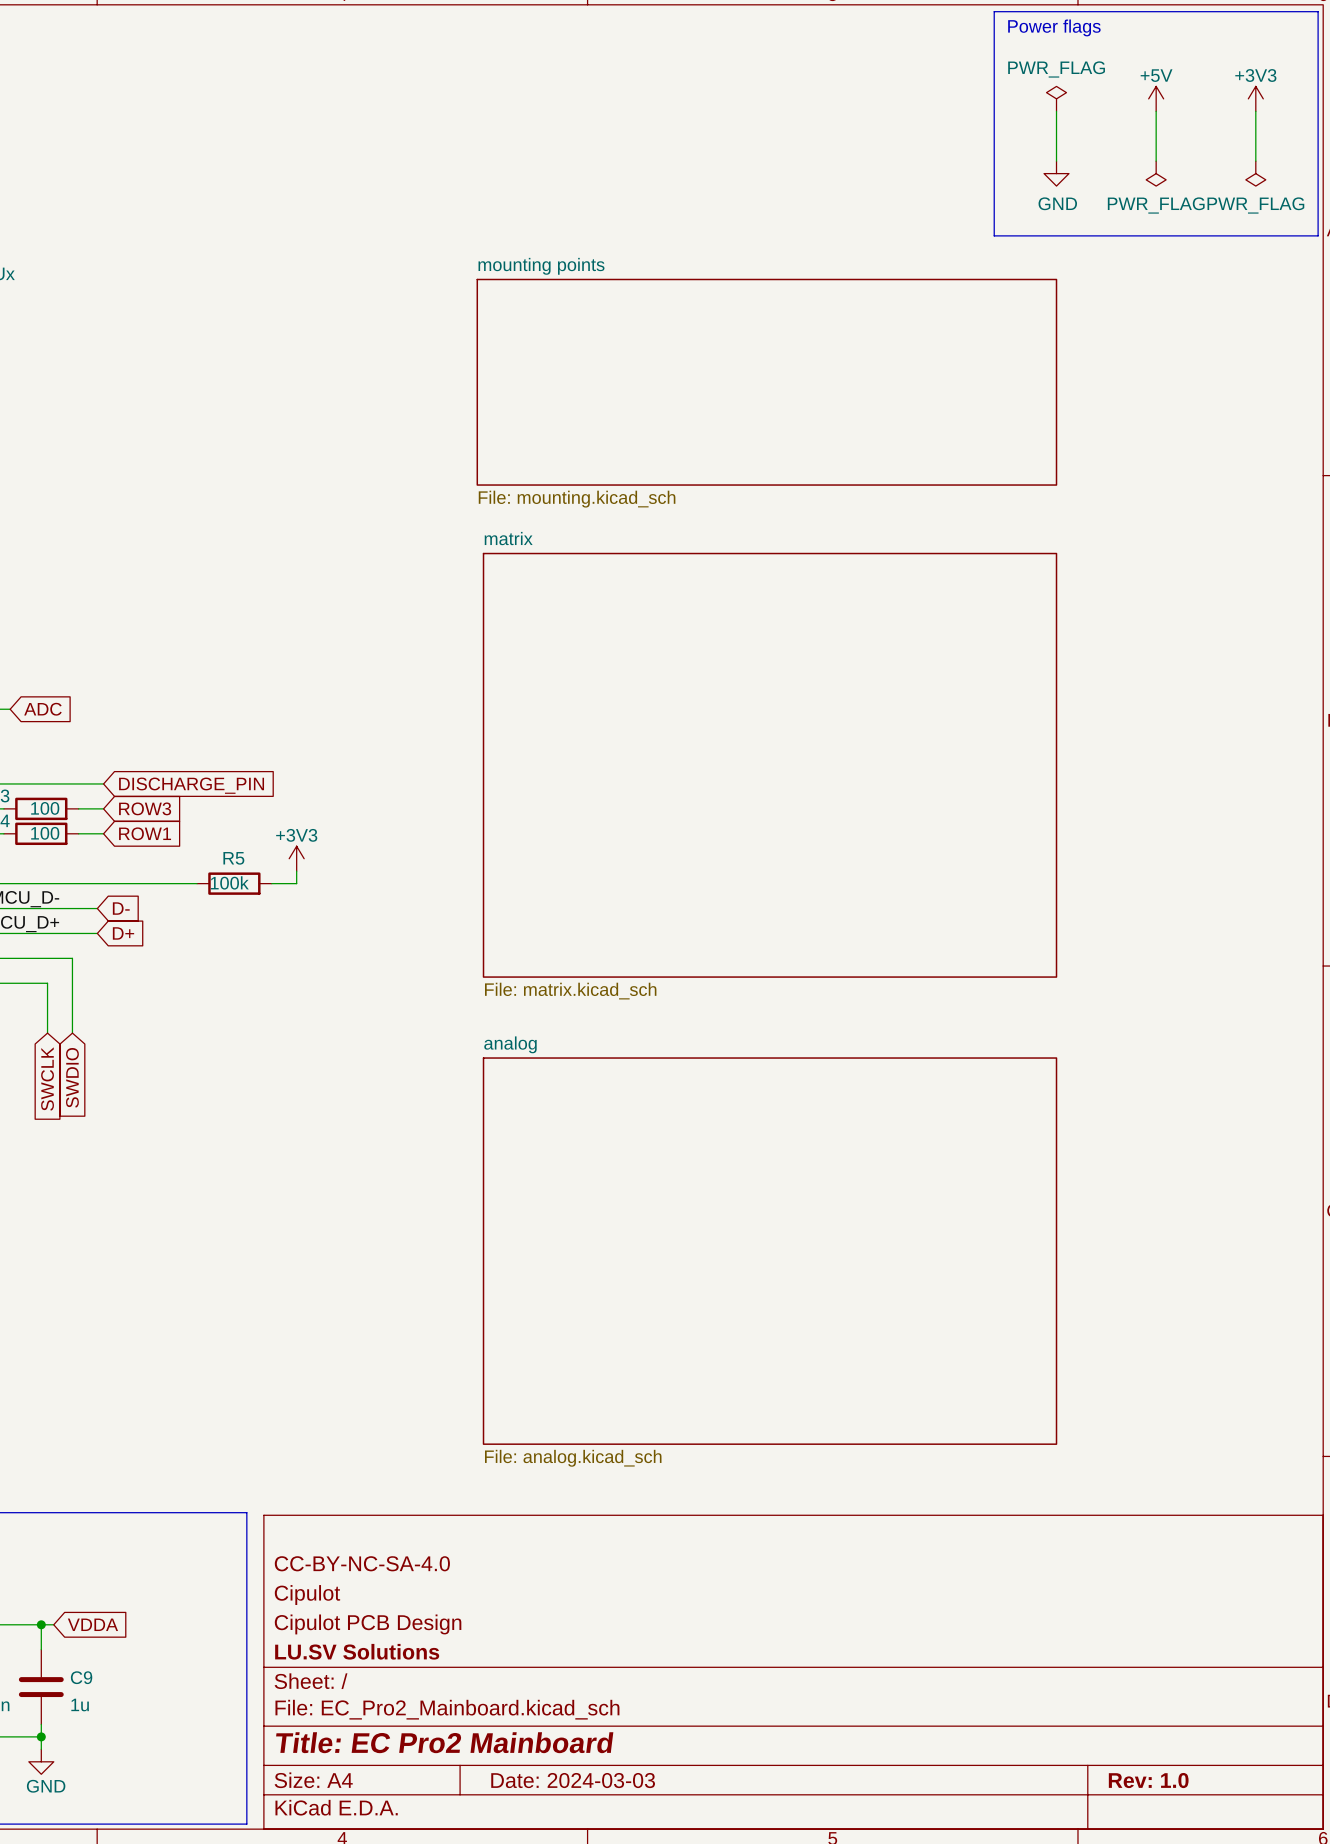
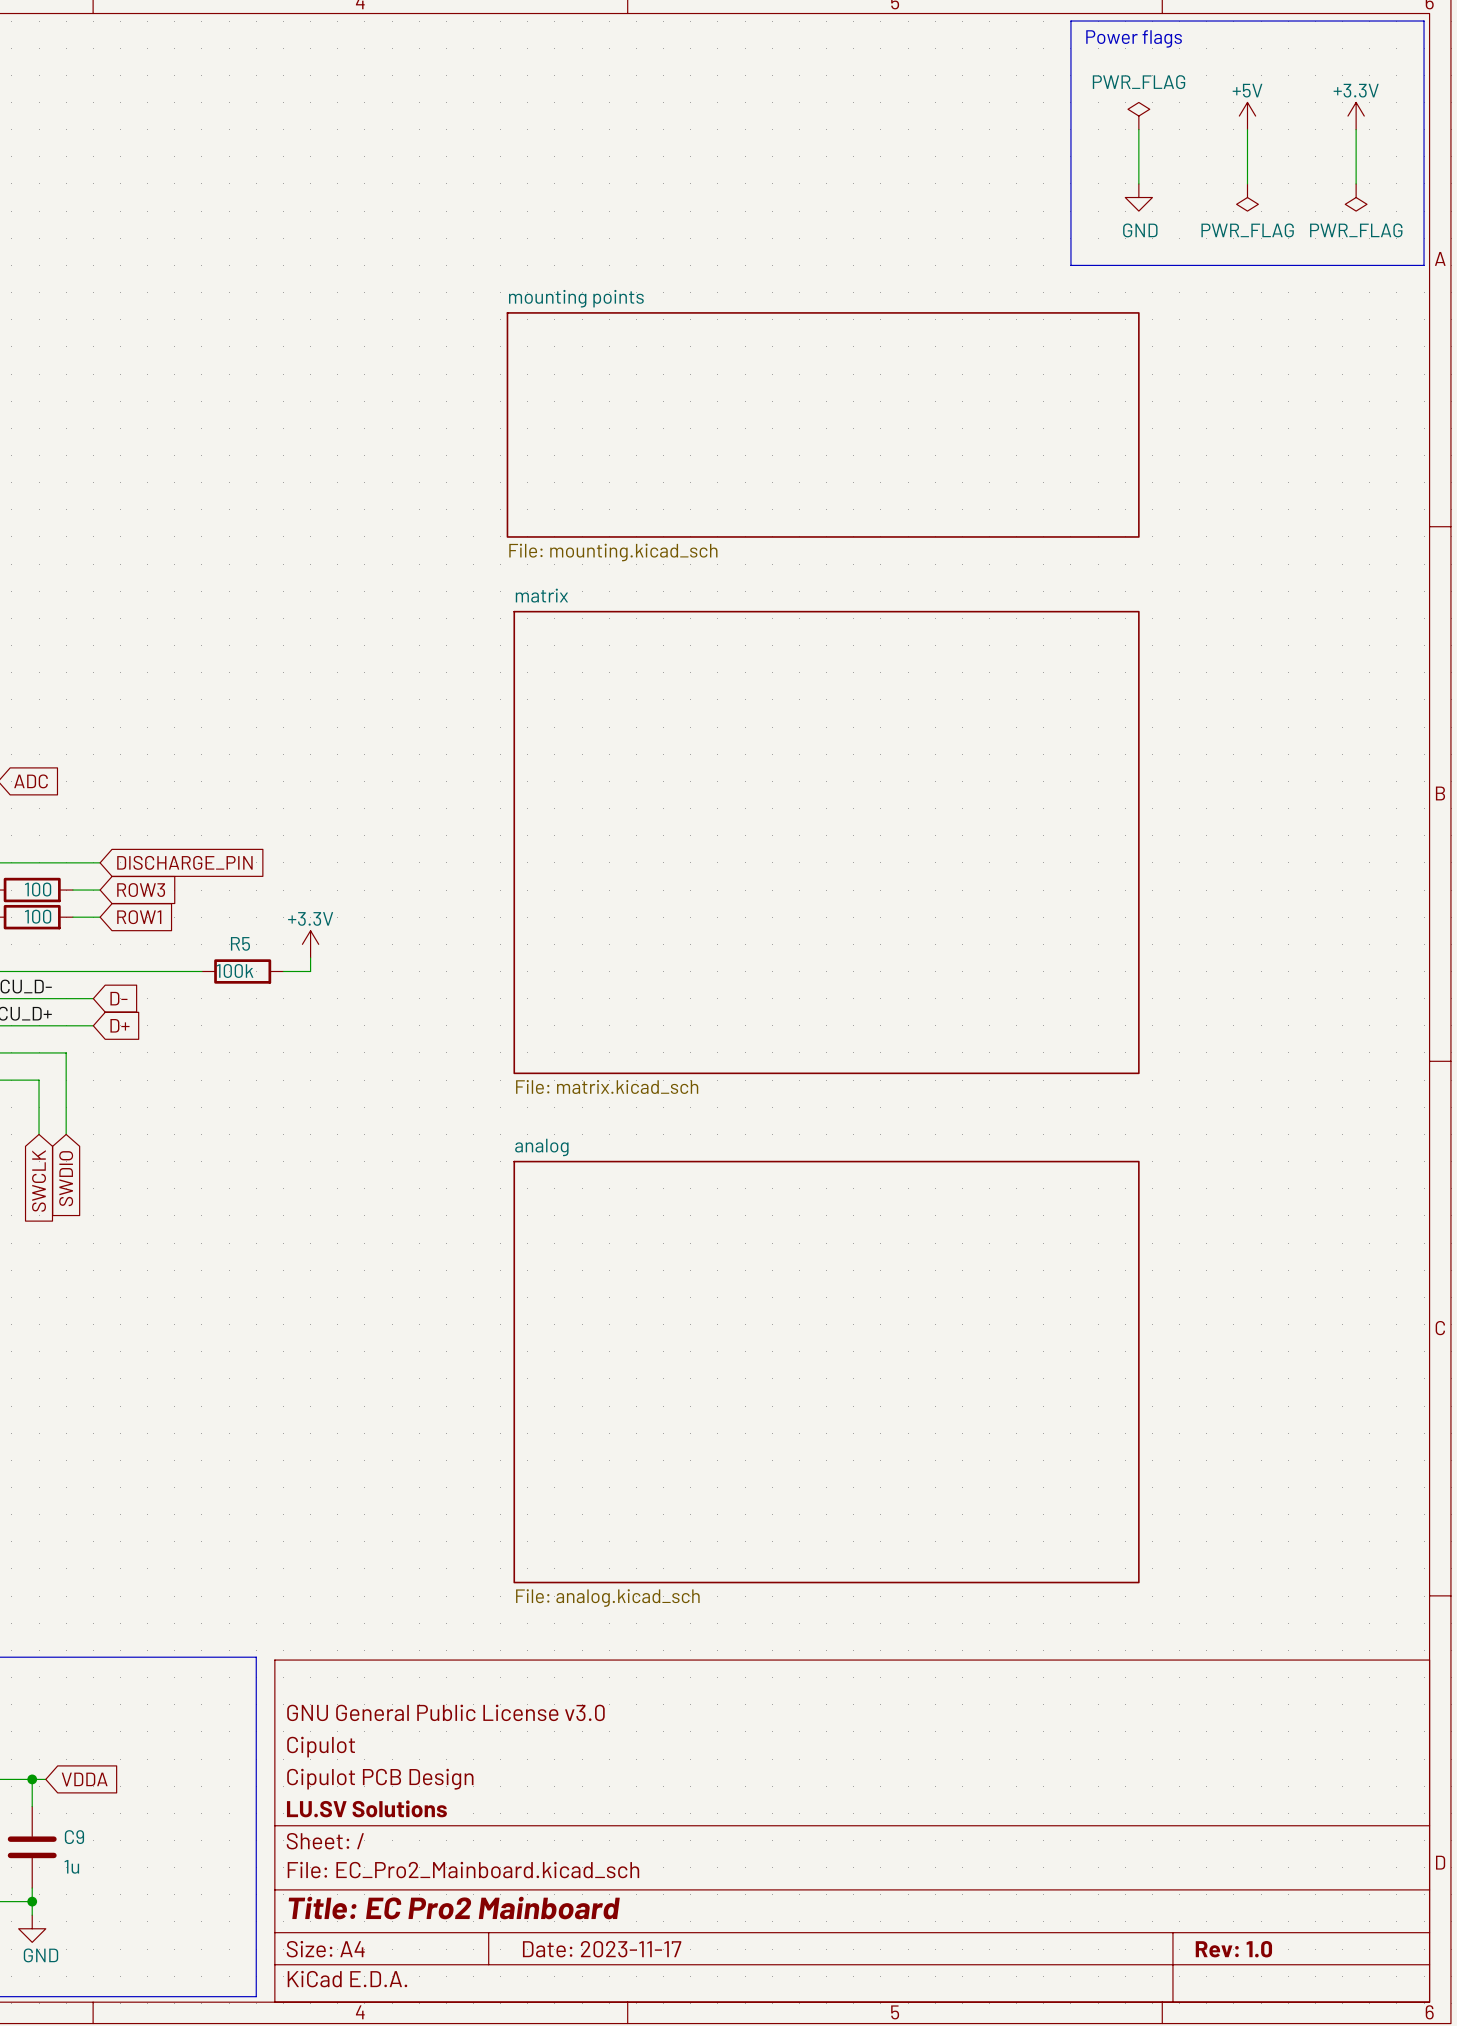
power symbol: +3V3 (1255, 98) -> +3.3V (1356, 116)
power symbol: +3V3 (296, 858) -> +3.3V (310, 944)
title block: CC-BY-NC-SA-4.0 (362, 1563) -> GNU General Public License v3.0 (445, 1712)
title block: Date: 2024-03-03 (573, 1780) -> Date: 2023-11-17 (602, 1949)

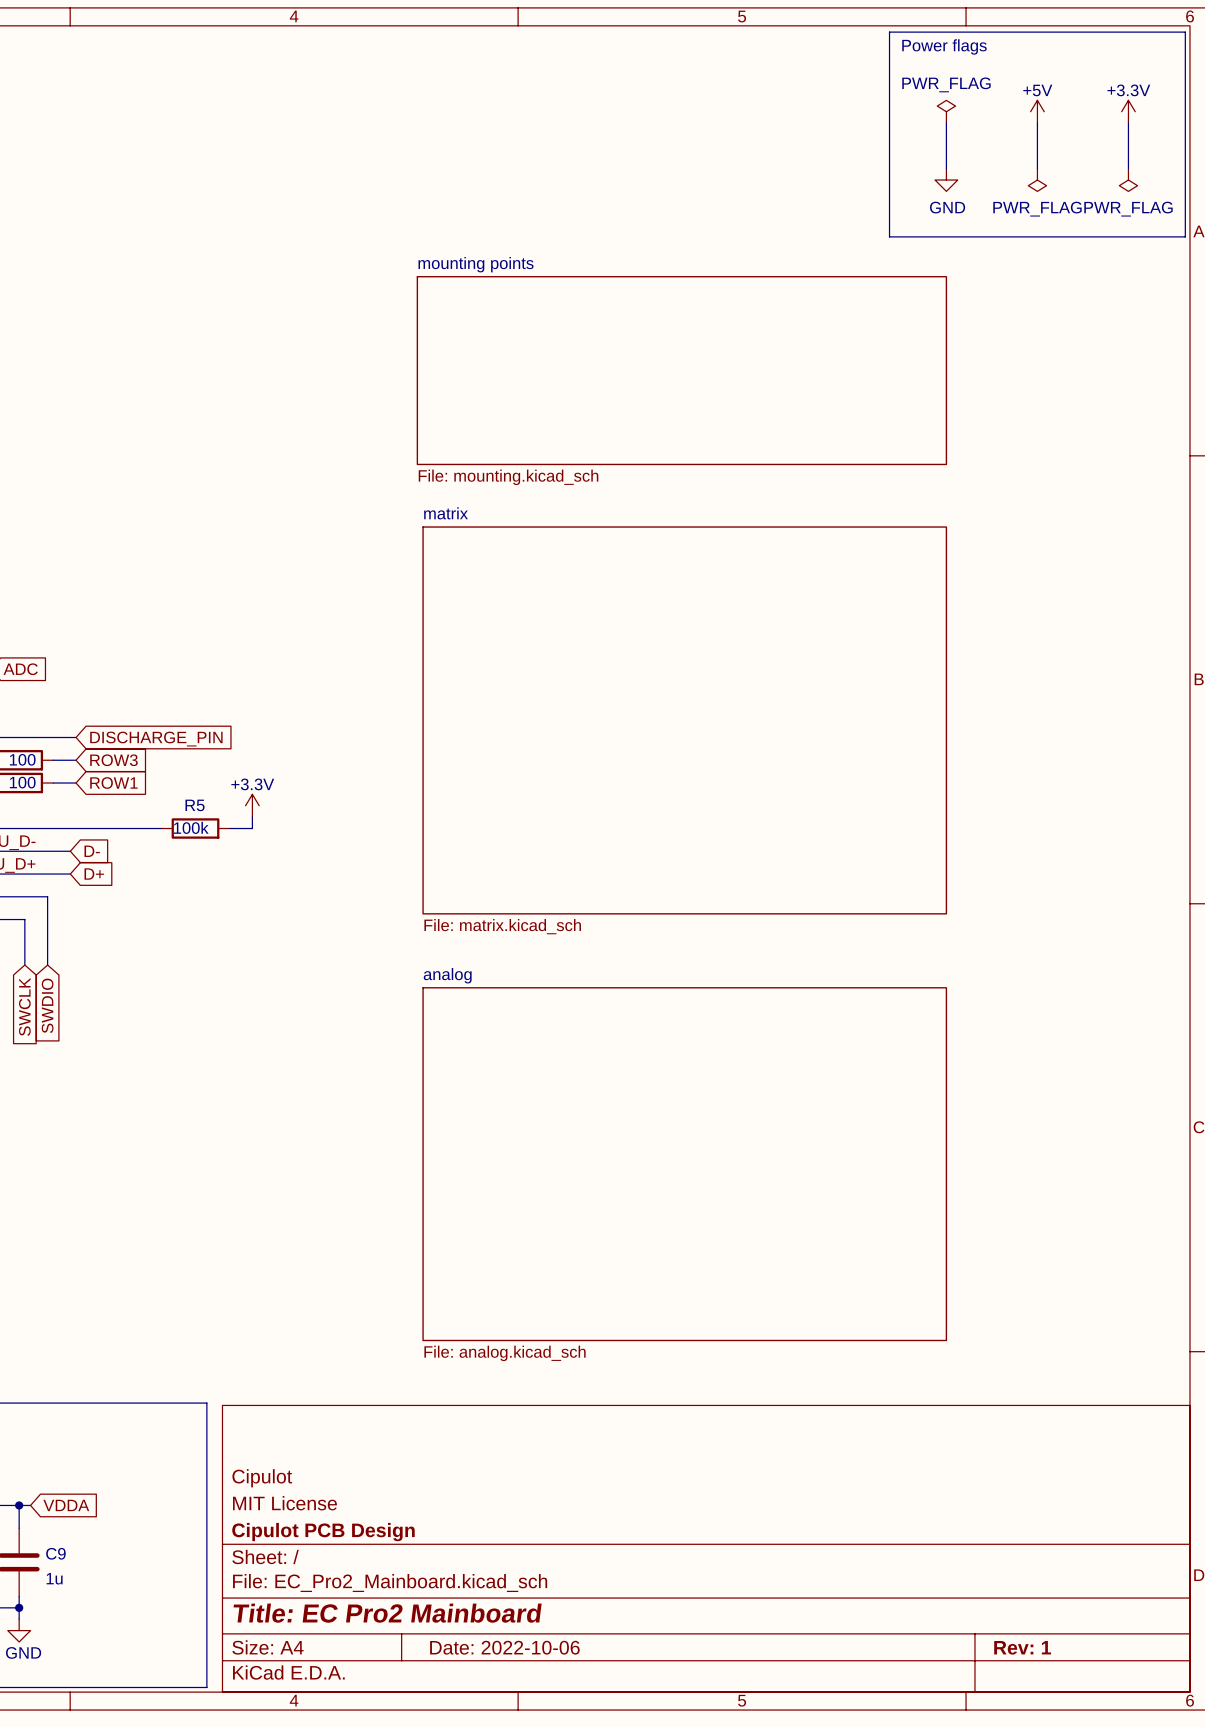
title block: GNU General Public License v3.0 (445, 1712) -> none
title block: Cipulot PCB Design (380, 1779) -> MIT License (284, 1503)
title block: LU.SV Solutions (366, 1808) -> Cipulot PCB Design (323, 1532)
title block: Date: 2023-11-17 (602, 1949) -> Date: 2022-10-06 (504, 1647)
title block: Rev: 1.0 (1233, 1949) -> Rev: 1 (1022, 1647)

